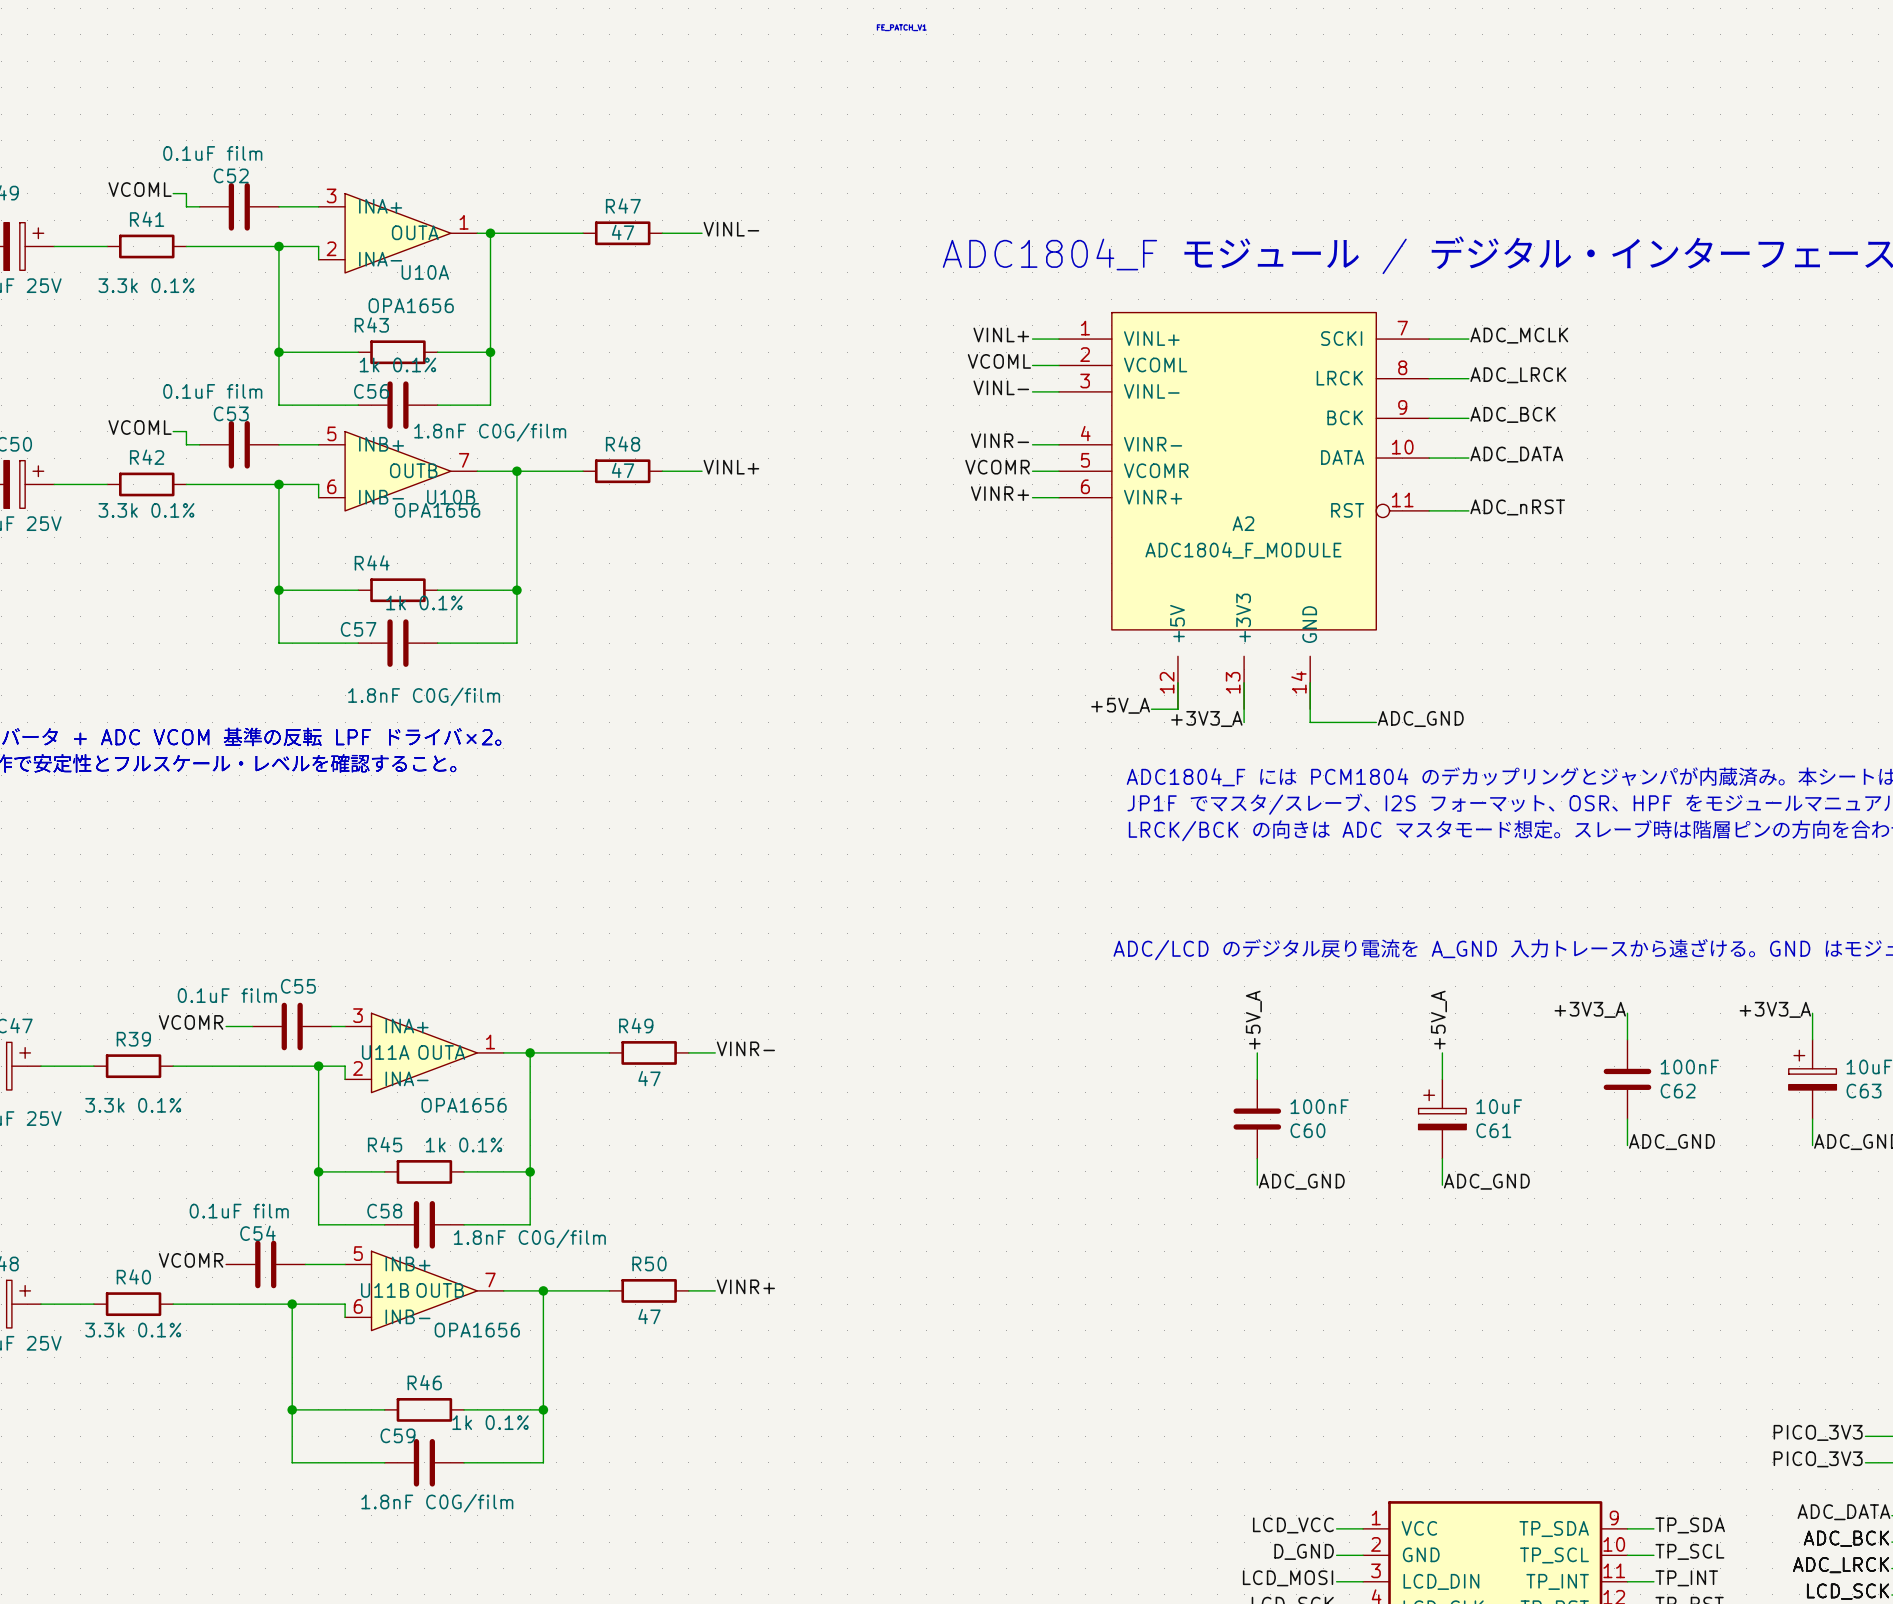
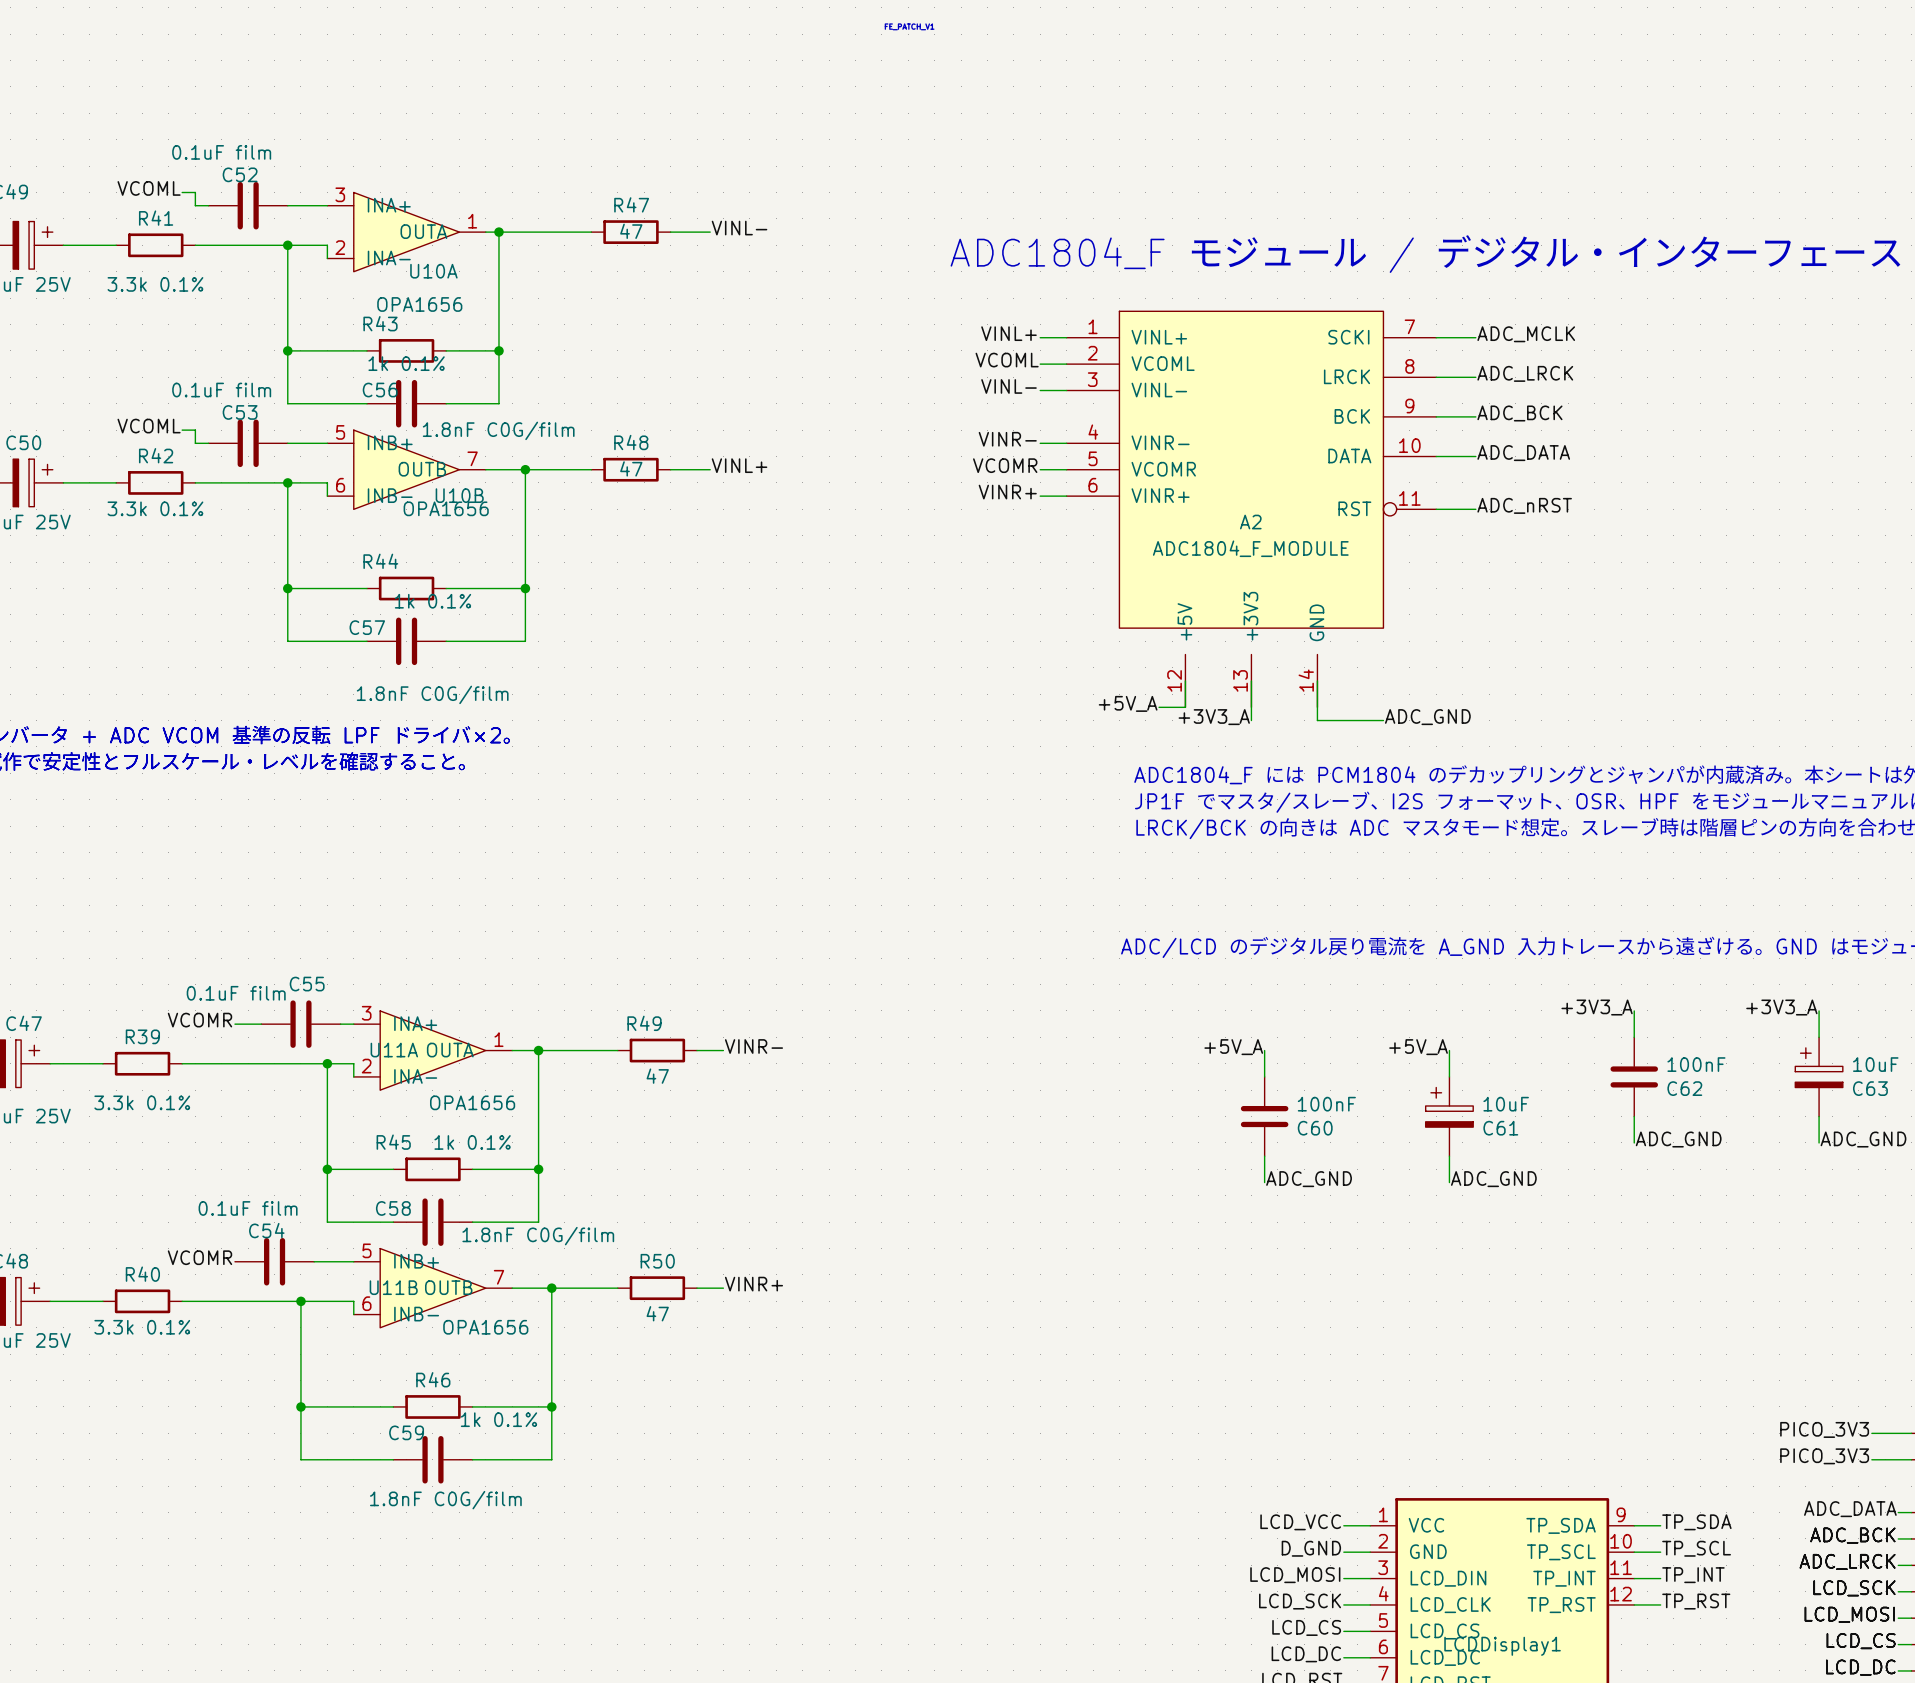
label rotation: 0° (1253, 1020) -> 90° clockwise (1233, 1047)
label rotation: 0° (1438, 1020) -> 90° clockwise (1418, 1047)

